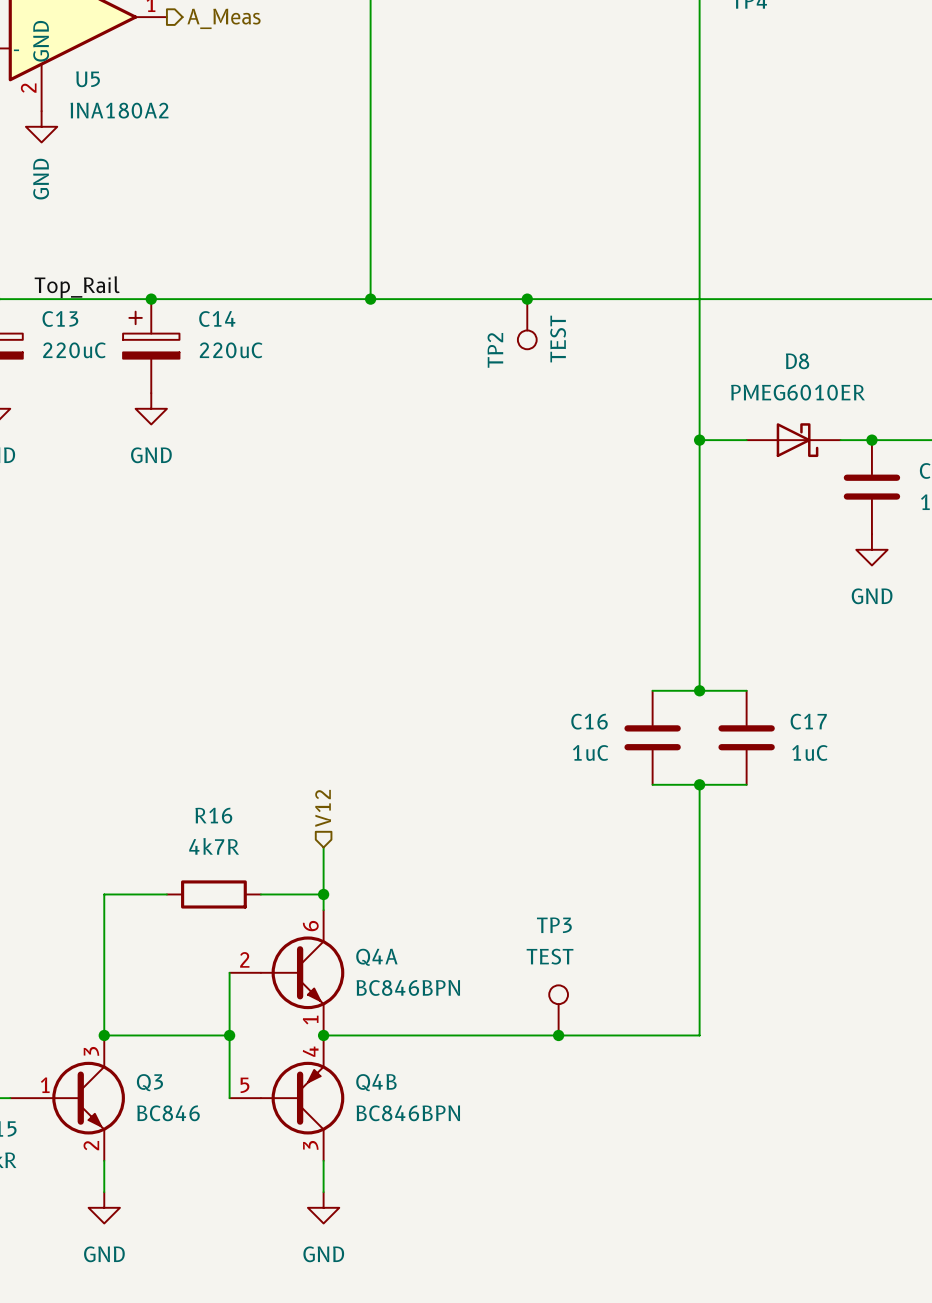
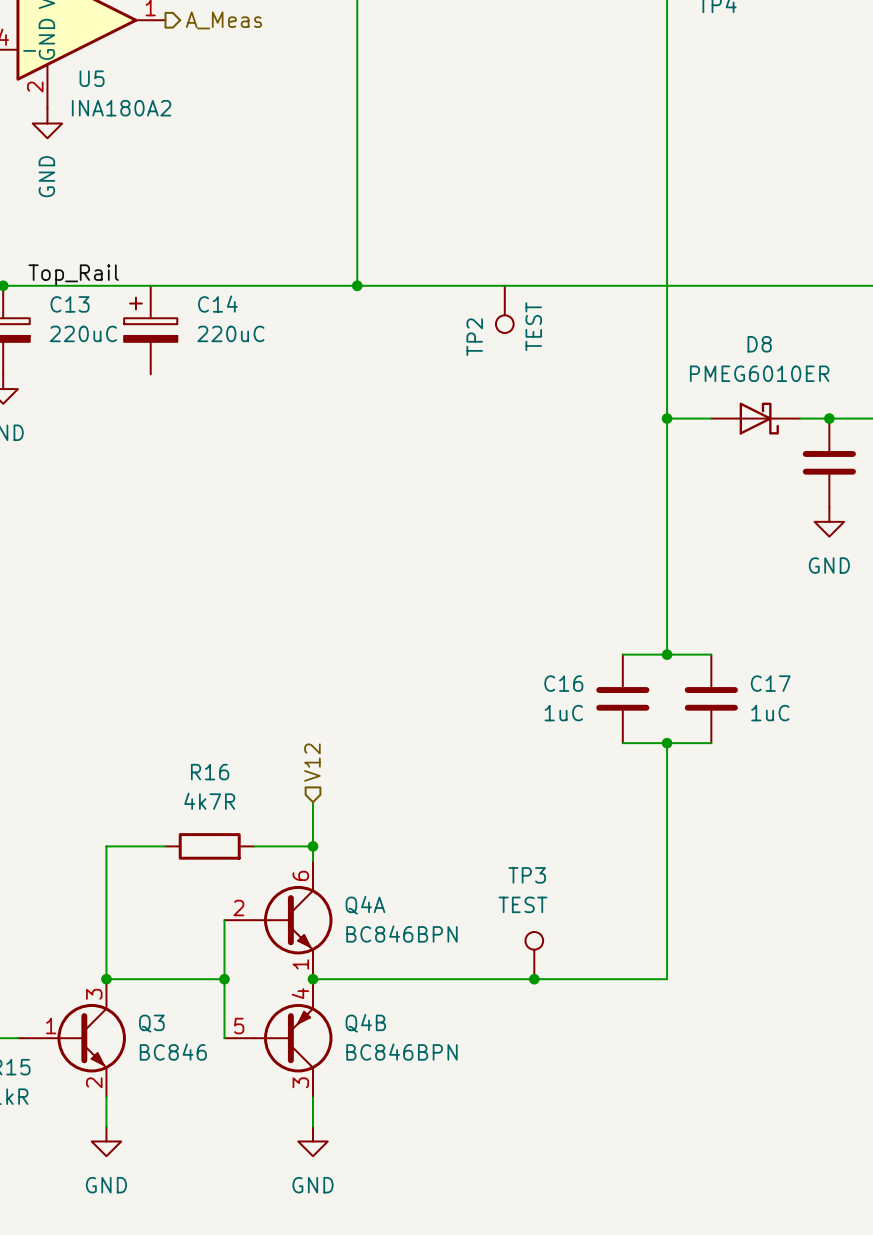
junction: (151, 299) -> none
junction: (527, 299) -> none
power symbol: GND (151, 408) -> none

